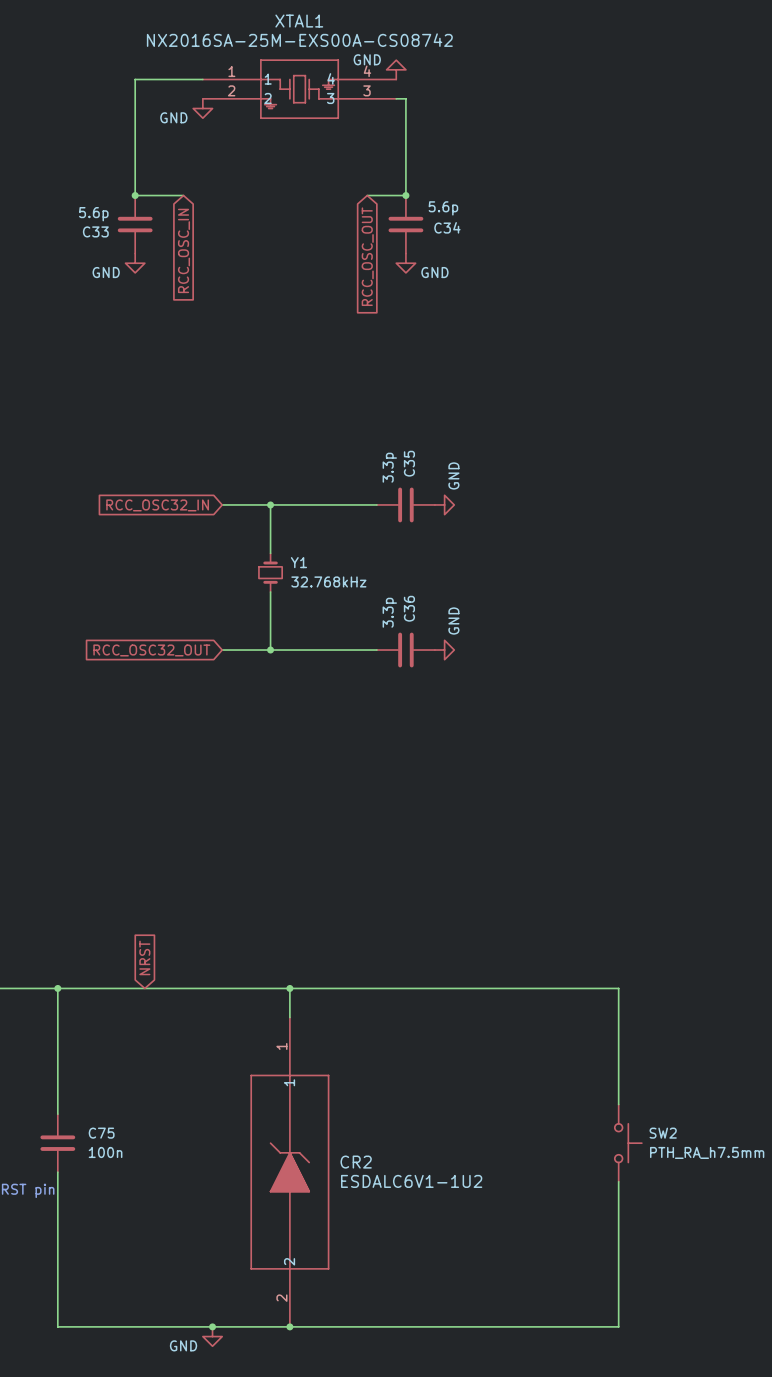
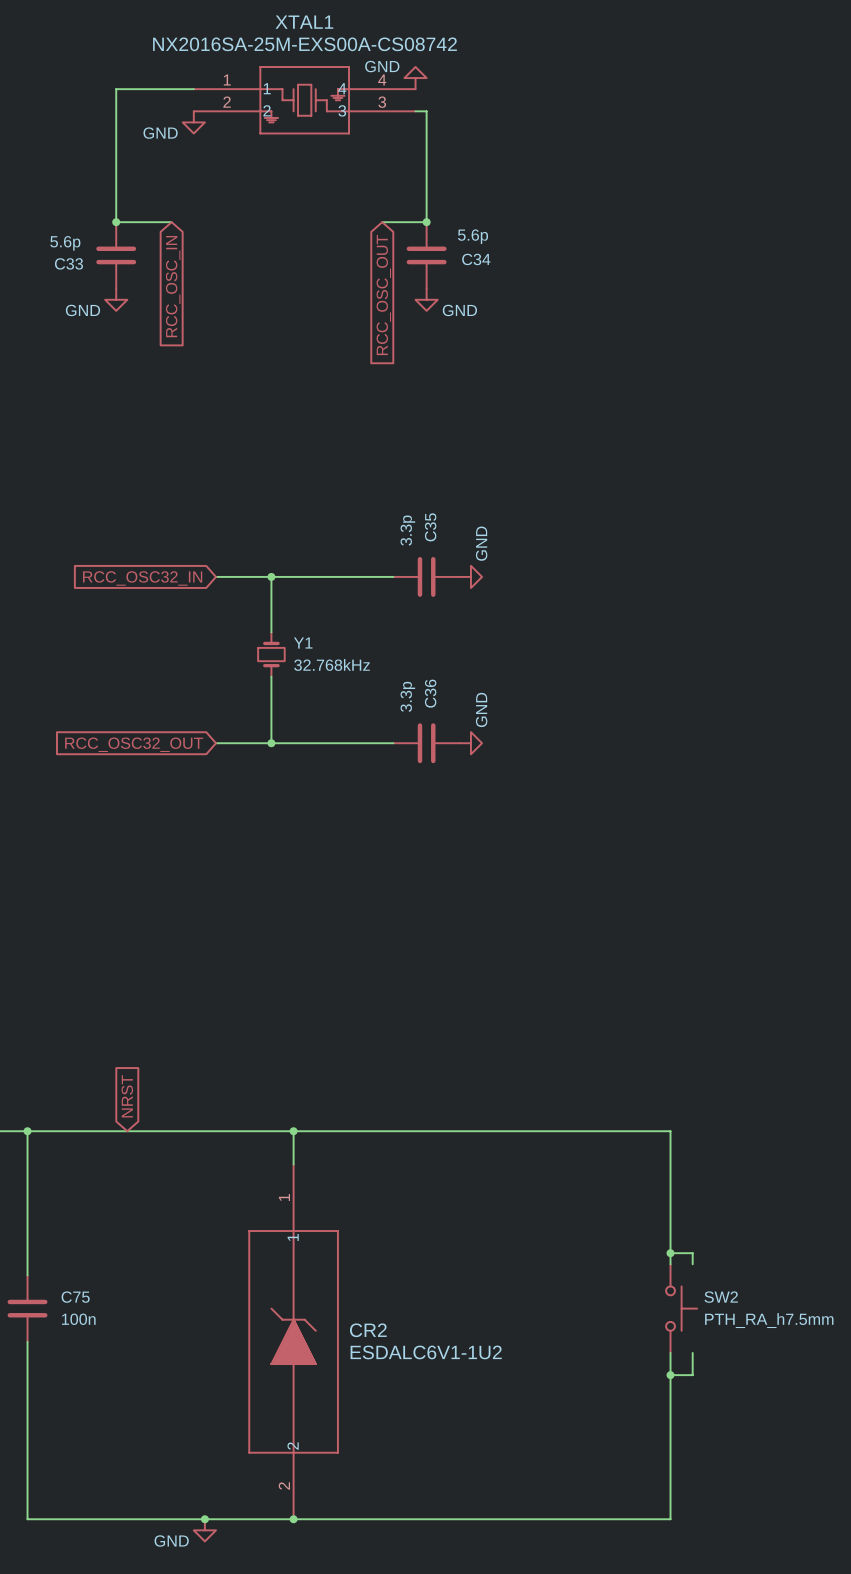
wire: none -> (670, 1253) (692, 1253) (692, 1264)
junction: none -> (670, 1253)
wire: none -> (692, 1352) (692, 1375) (670, 1375)
junction: none -> (670, 1375)

